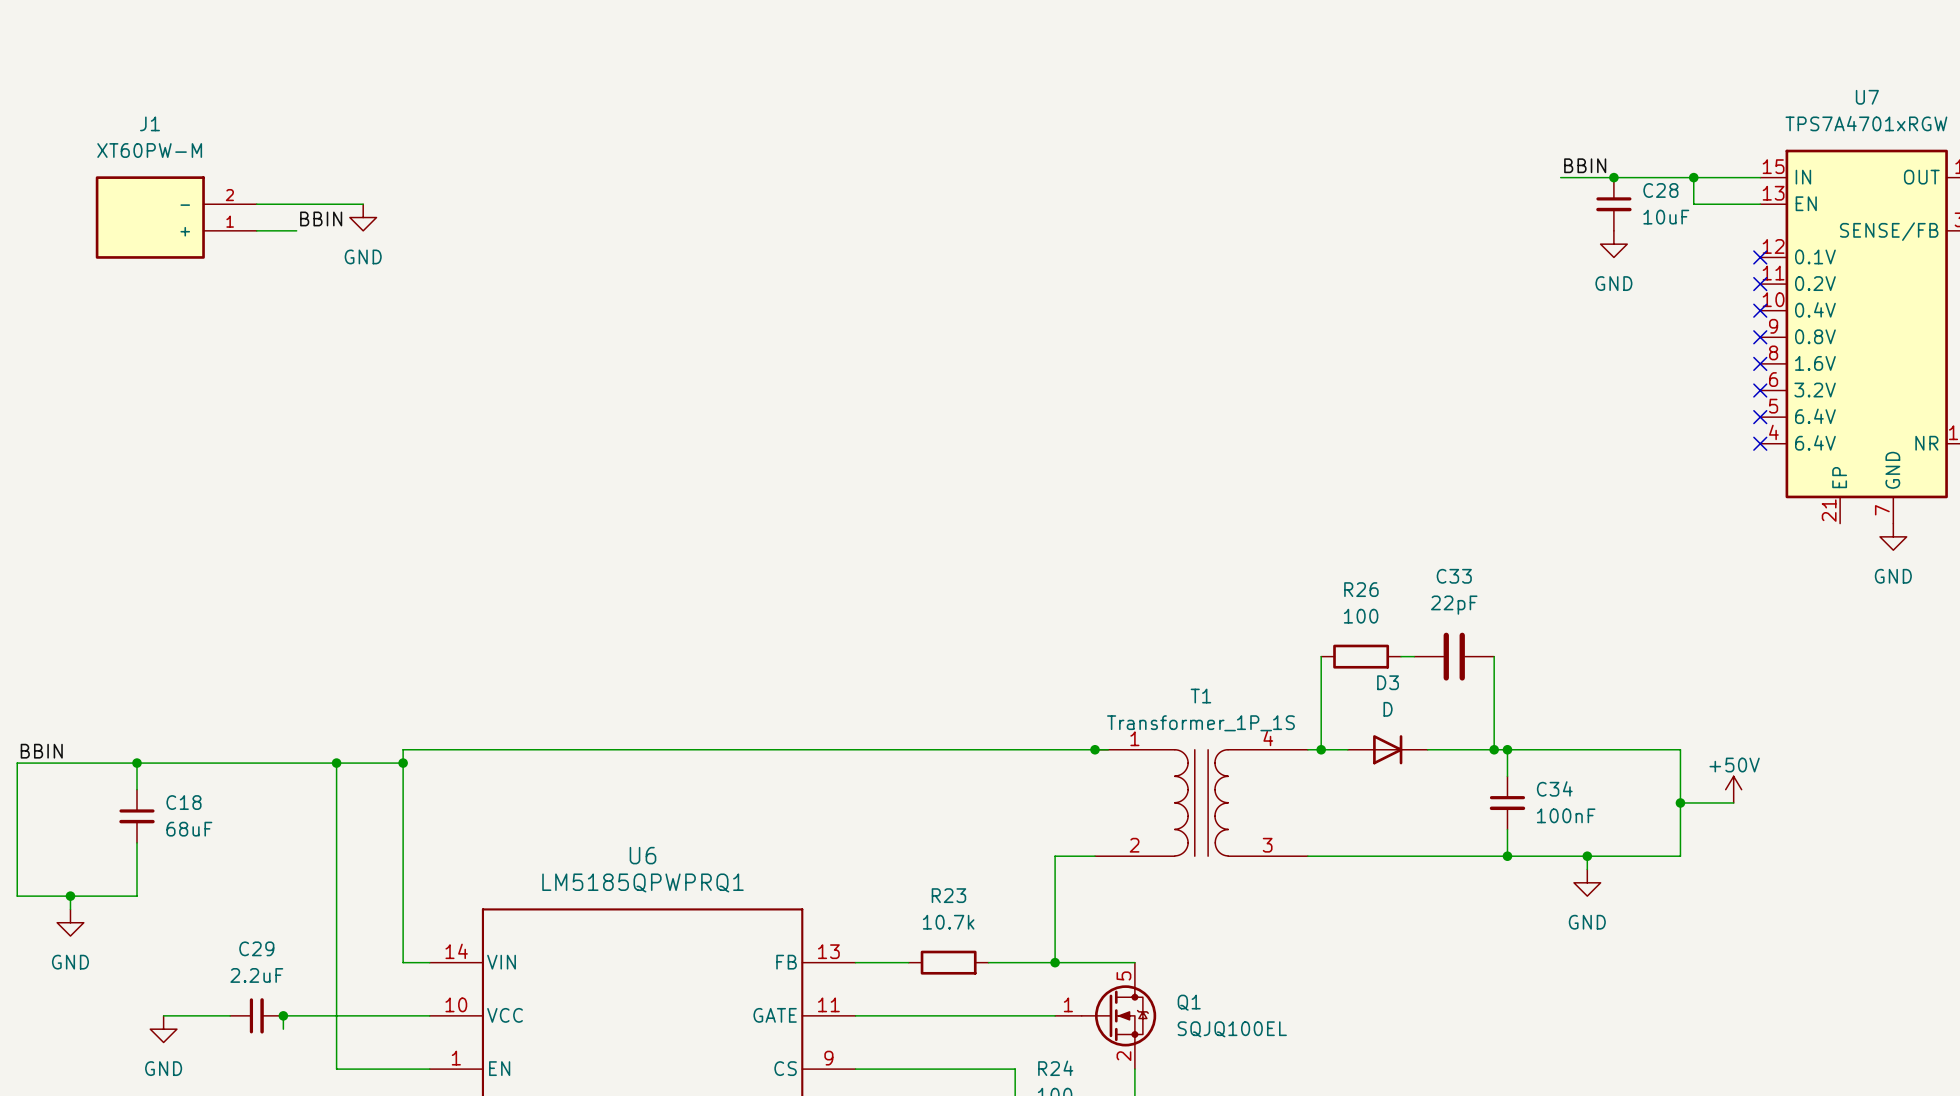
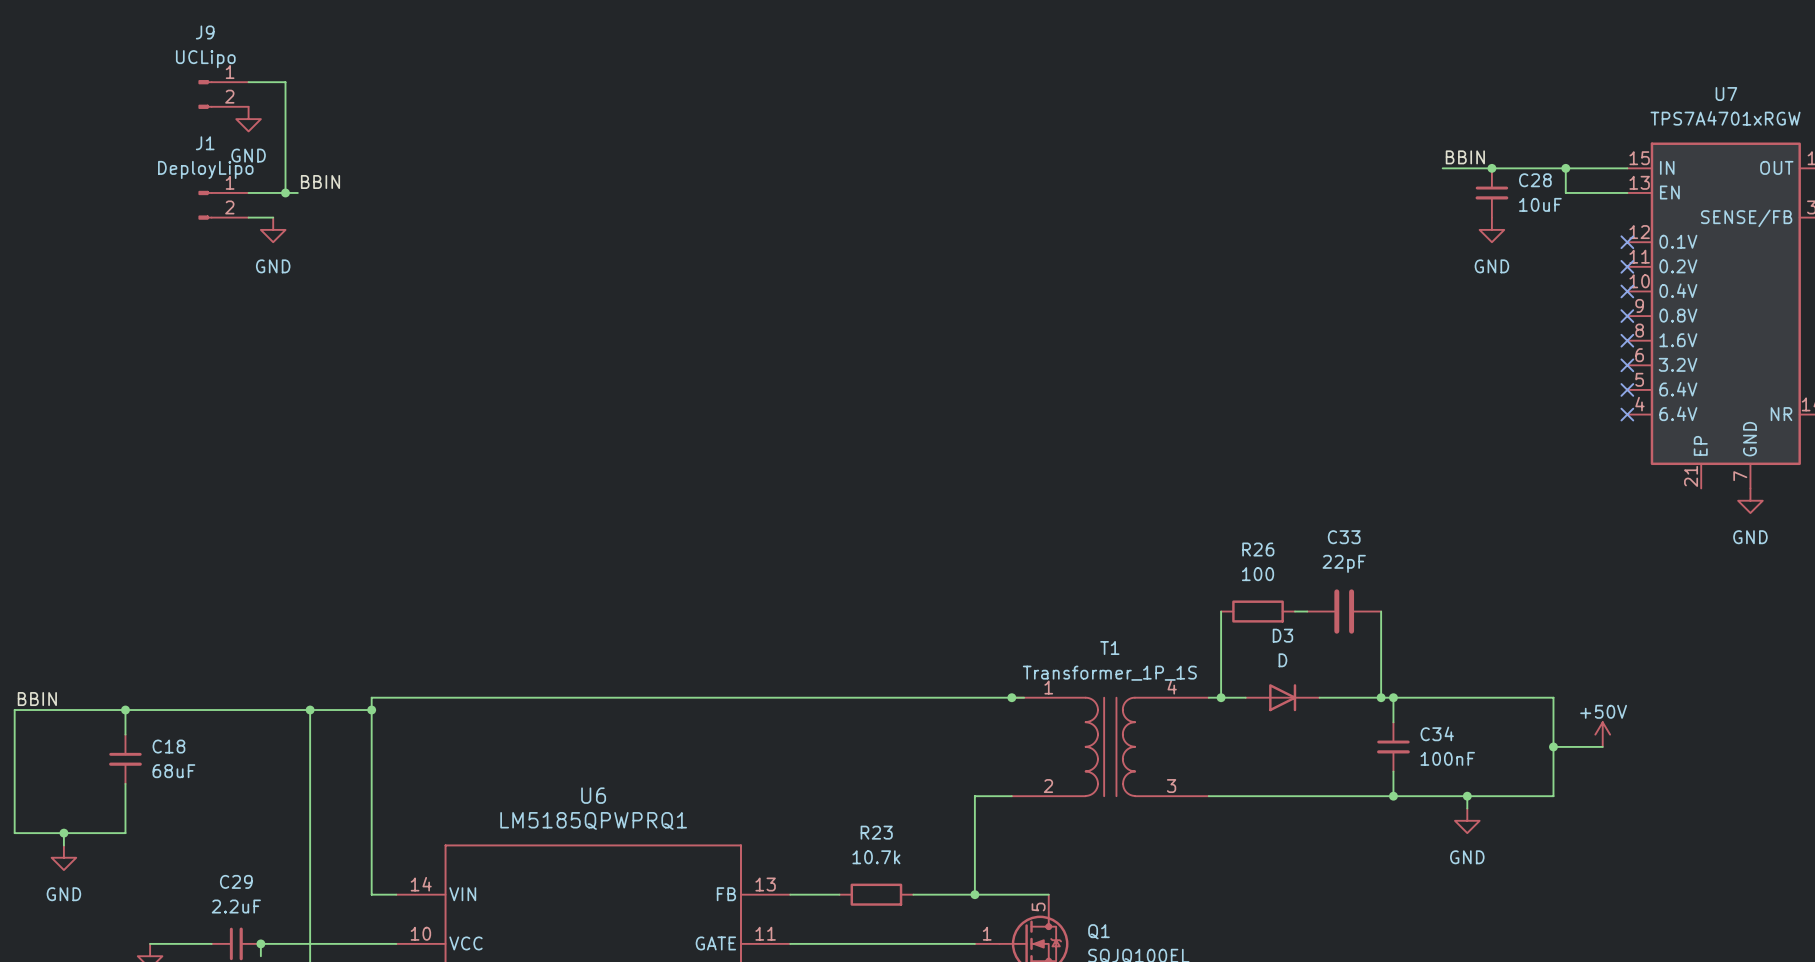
wire: none -> (248, 82) (285, 82) (285, 192)
J9: none -> UCLipo (223, 94)
J1 name position: J1 (149, 123) -> J1 (205, 143)
power symbol: none -> GND (248, 119)
J1 value: XT60PW-M (149, 150) -> DeployLipo (205, 169)
J1 symbol: [95, 176, 257, 259] -> [198, 191, 249, 220]
junction: none -> (285, 192)
wire: (323, 204) (363, 204) -> none
power symbol: GND (363, 217) -> none
label position: BBIN (321, 218) -> BBIN (320, 181)
power symbol: none -> GND (273, 229)

